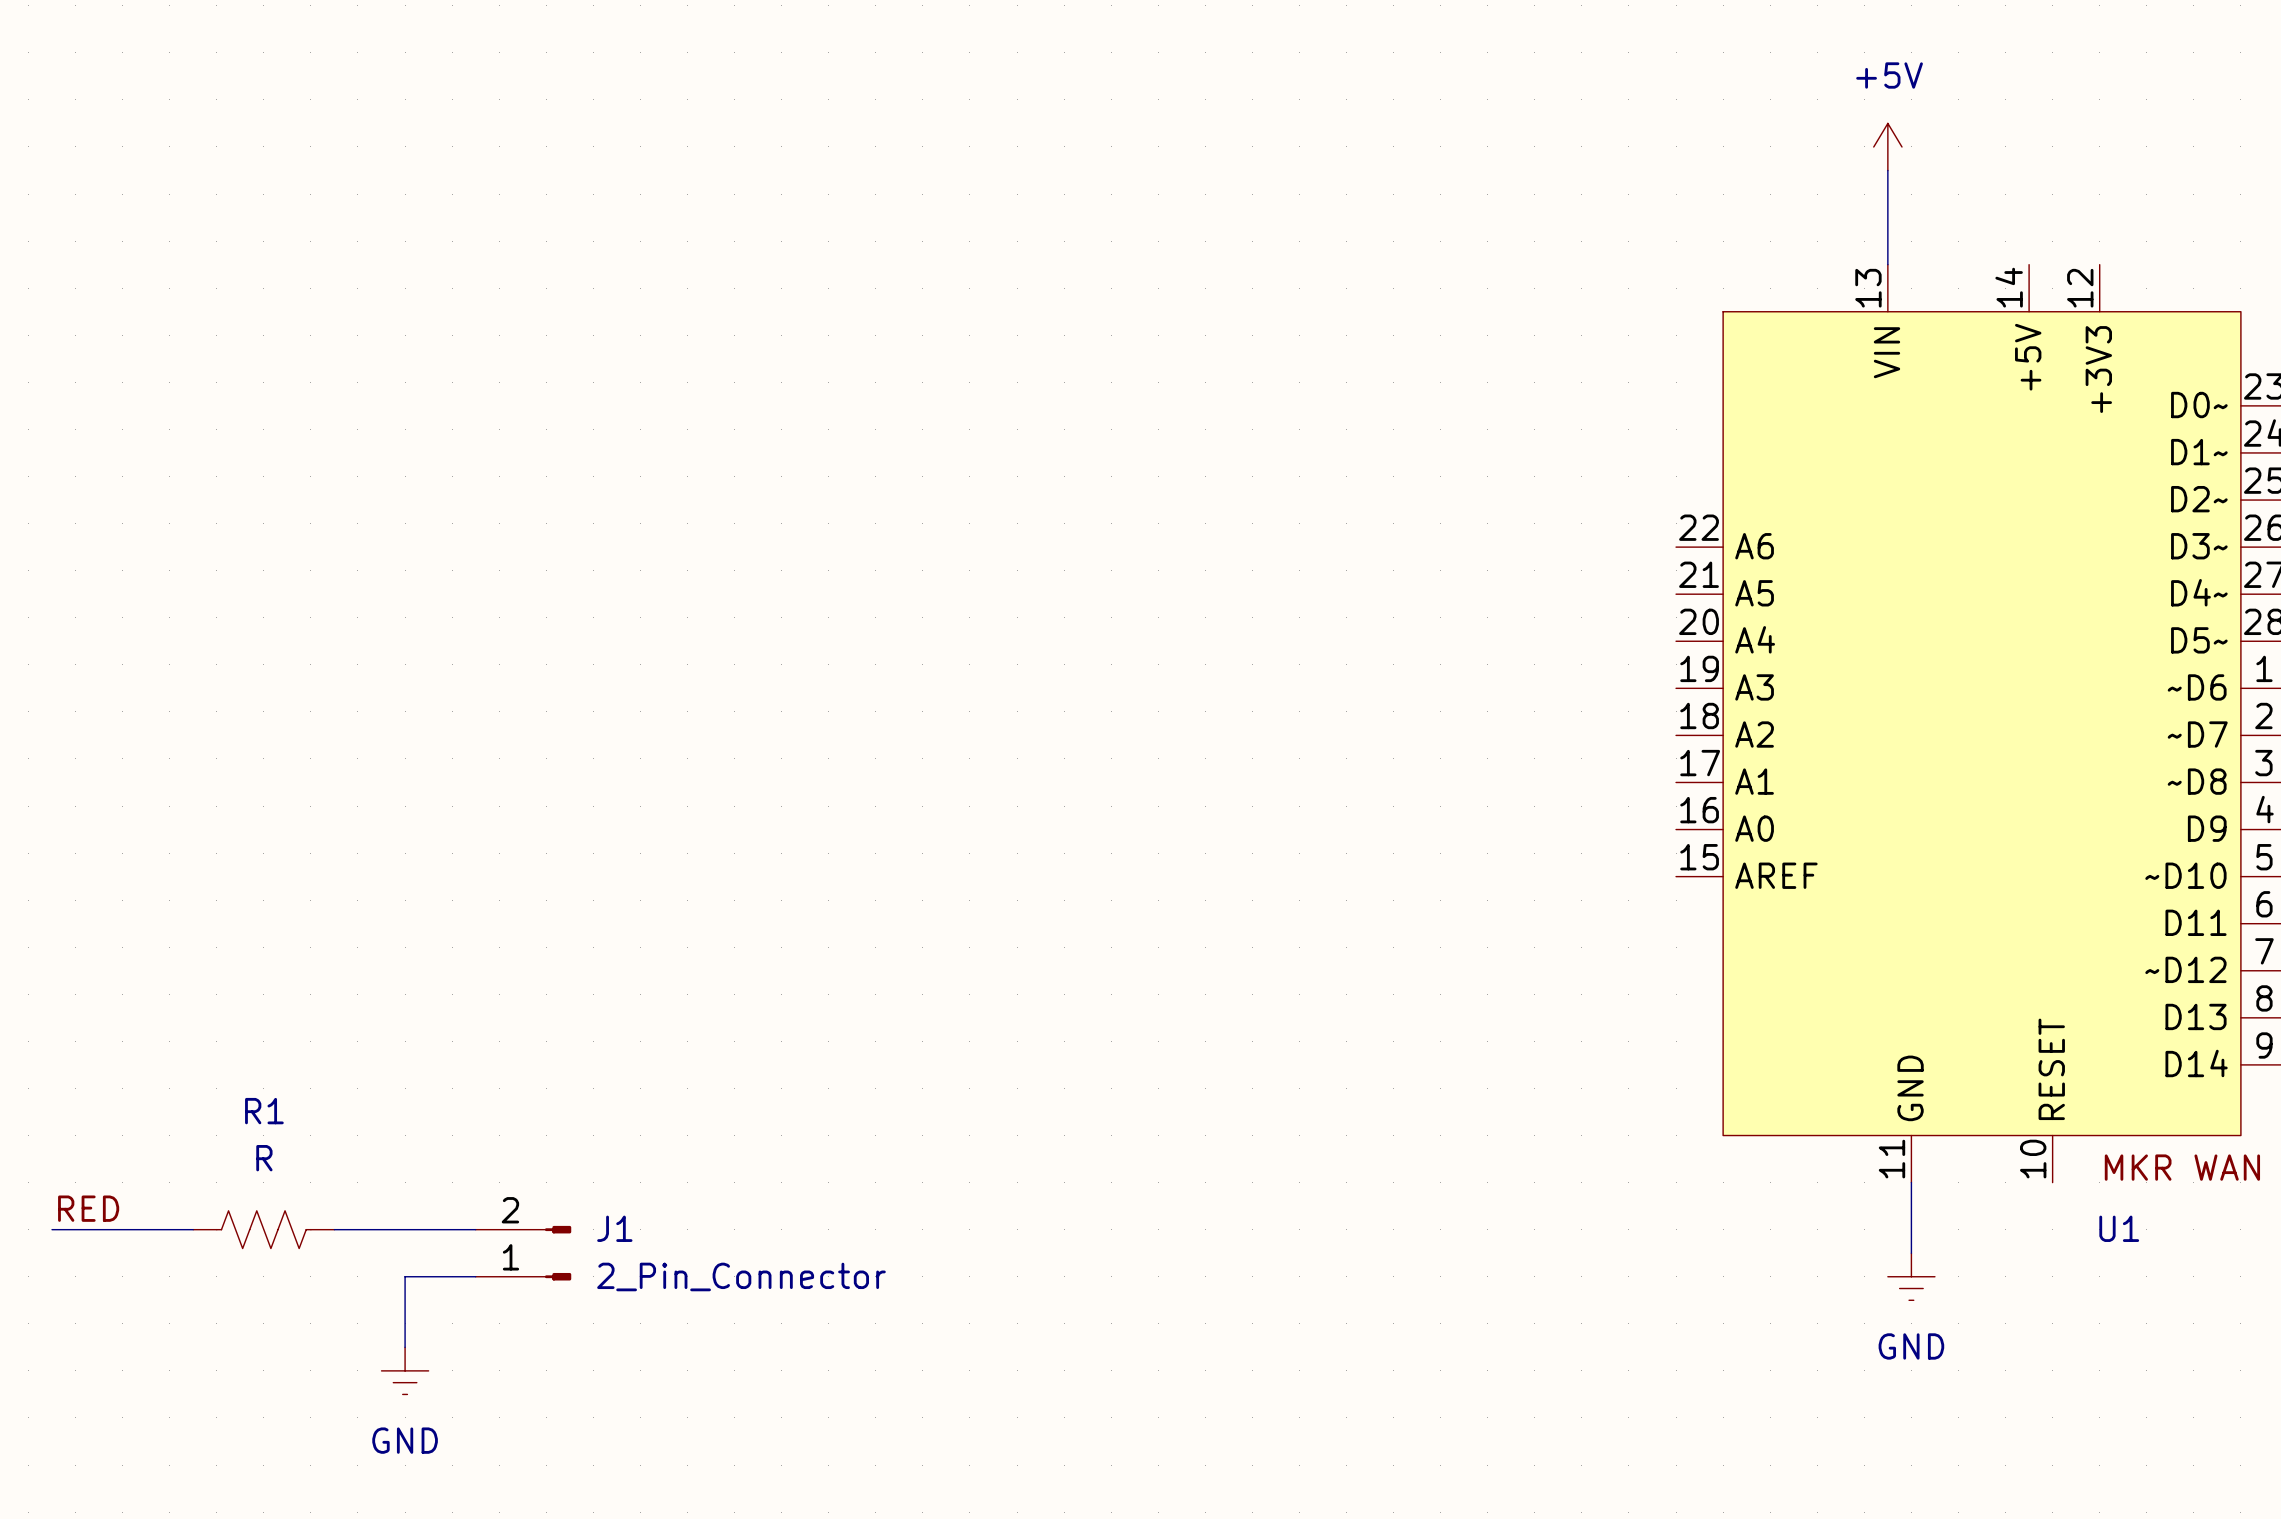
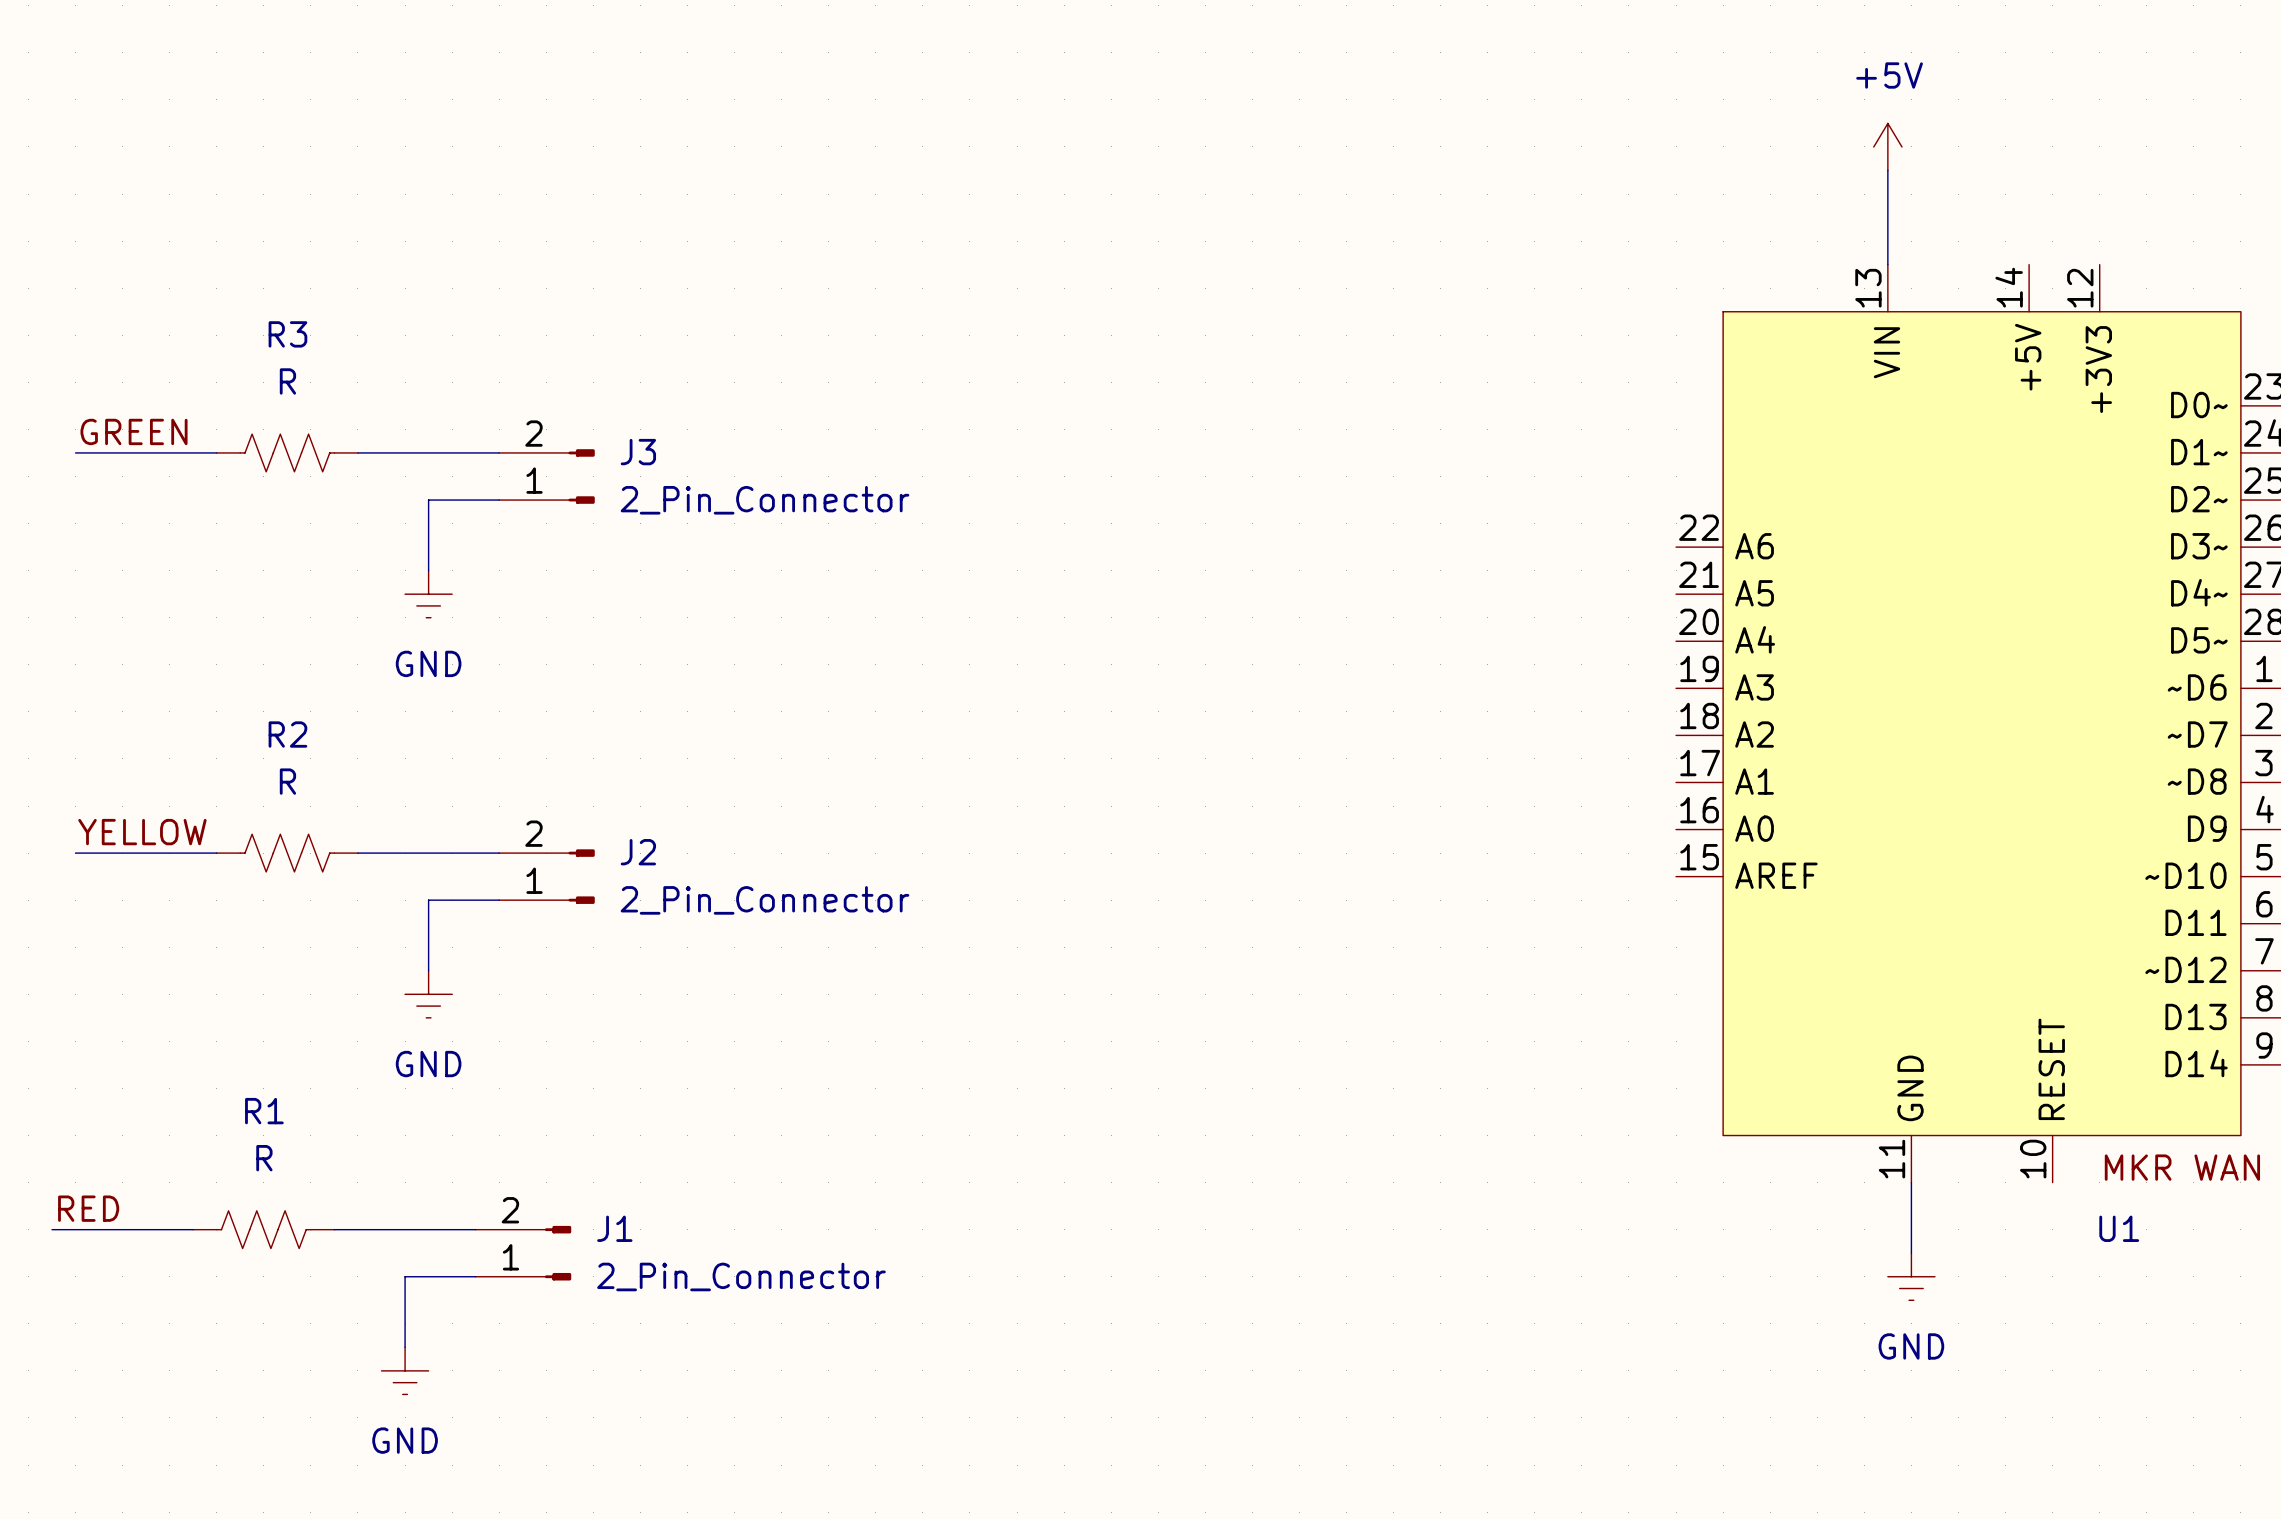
label: none -> GREEN (134, 431)
wire: none -> (75, 452) (216, 452)
R3: none -> R (287, 452)
wire: none -> (357, 452) (499, 452)
J3: none -> 2_Pin_Connector (546, 476)
wire: none -> (499, 500) (428, 500) (428, 570)
power symbol: none -> GND (428, 594)
label: none -> YELLOW (142, 832)
wire: none -> (75, 853) (216, 853)
R2: none -> R (287, 853)
wire: none -> (357, 853) (499, 853)
J2: none -> 2_Pin_Connector (546, 876)
wire: none -> (499, 900) (428, 900) (428, 970)
power symbol: none -> GND (428, 994)

